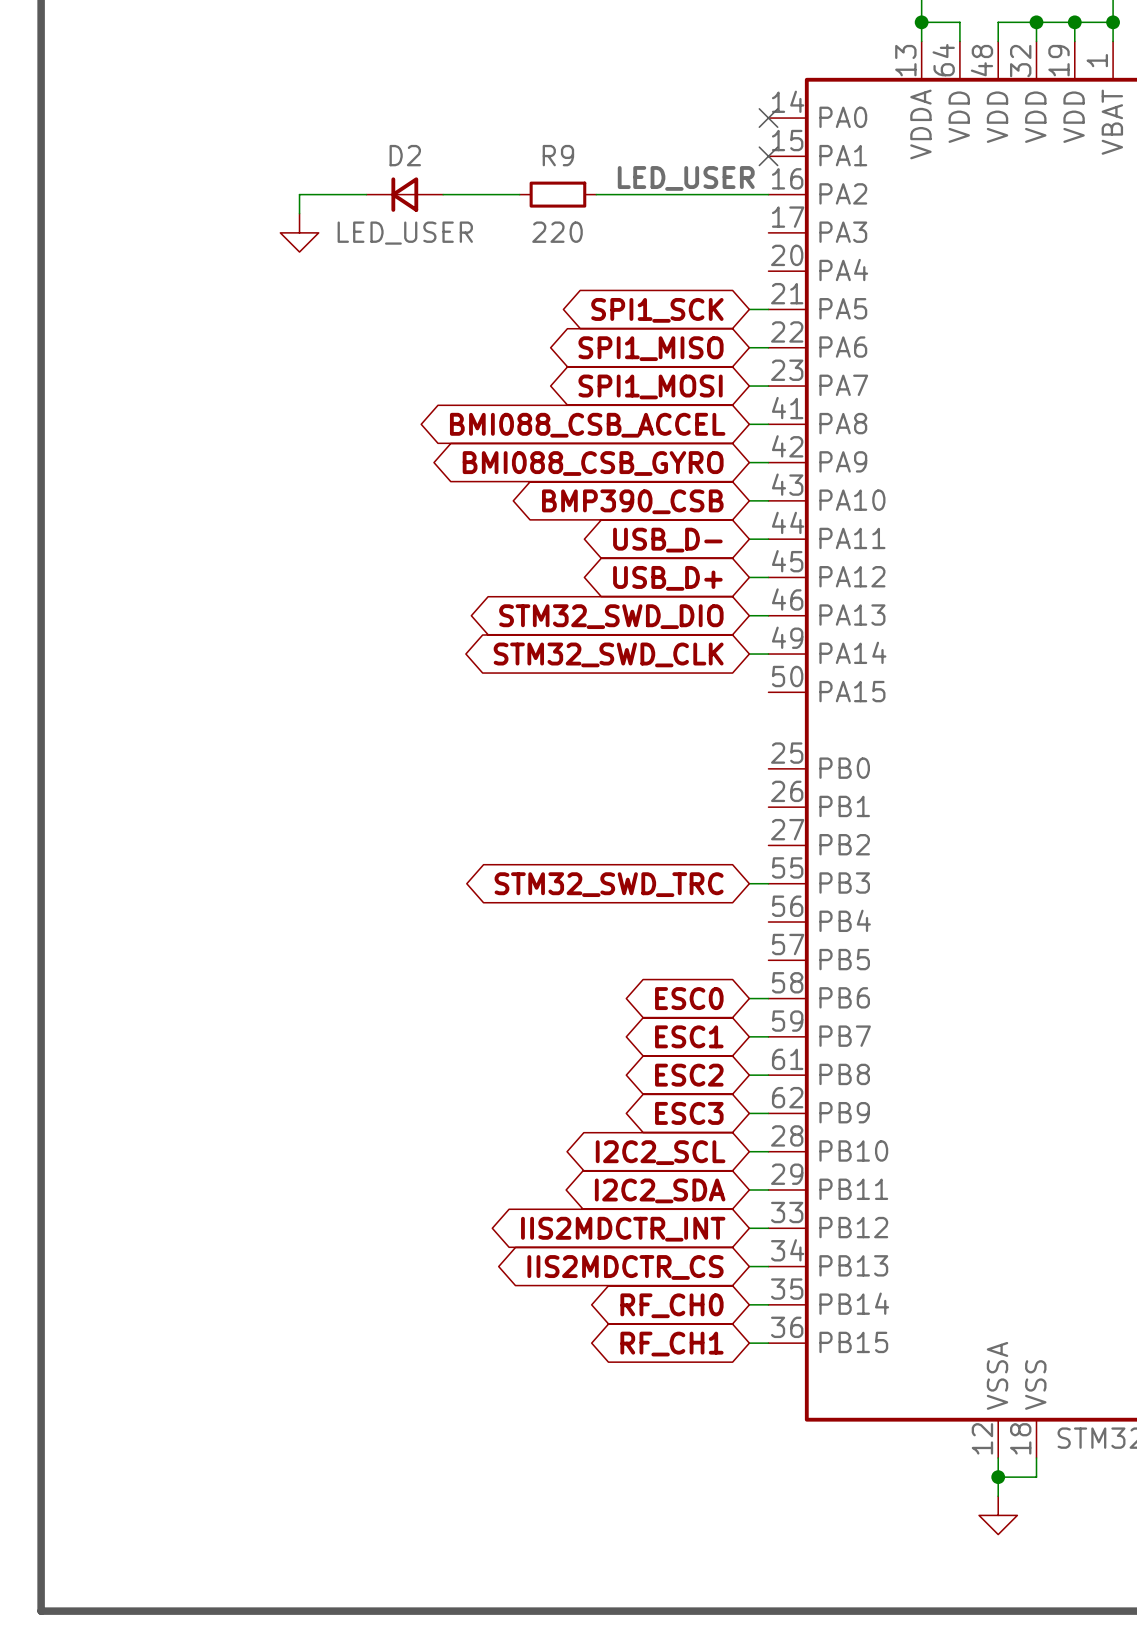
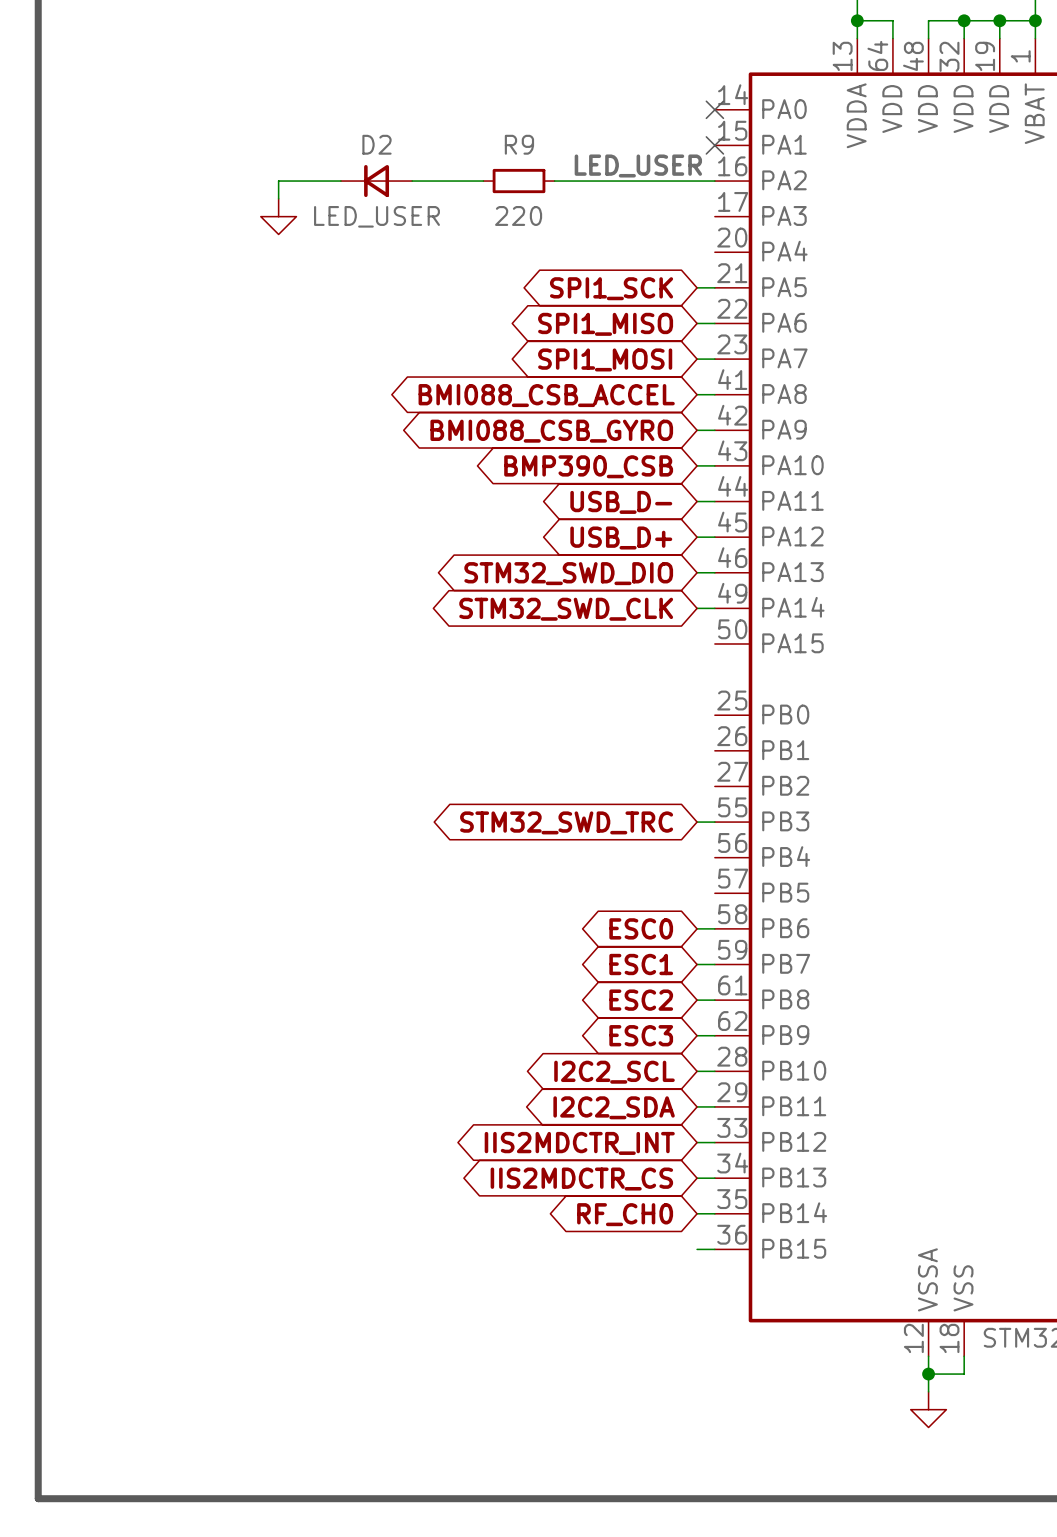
global label: RF_CH1 (671, 1344) -> none

